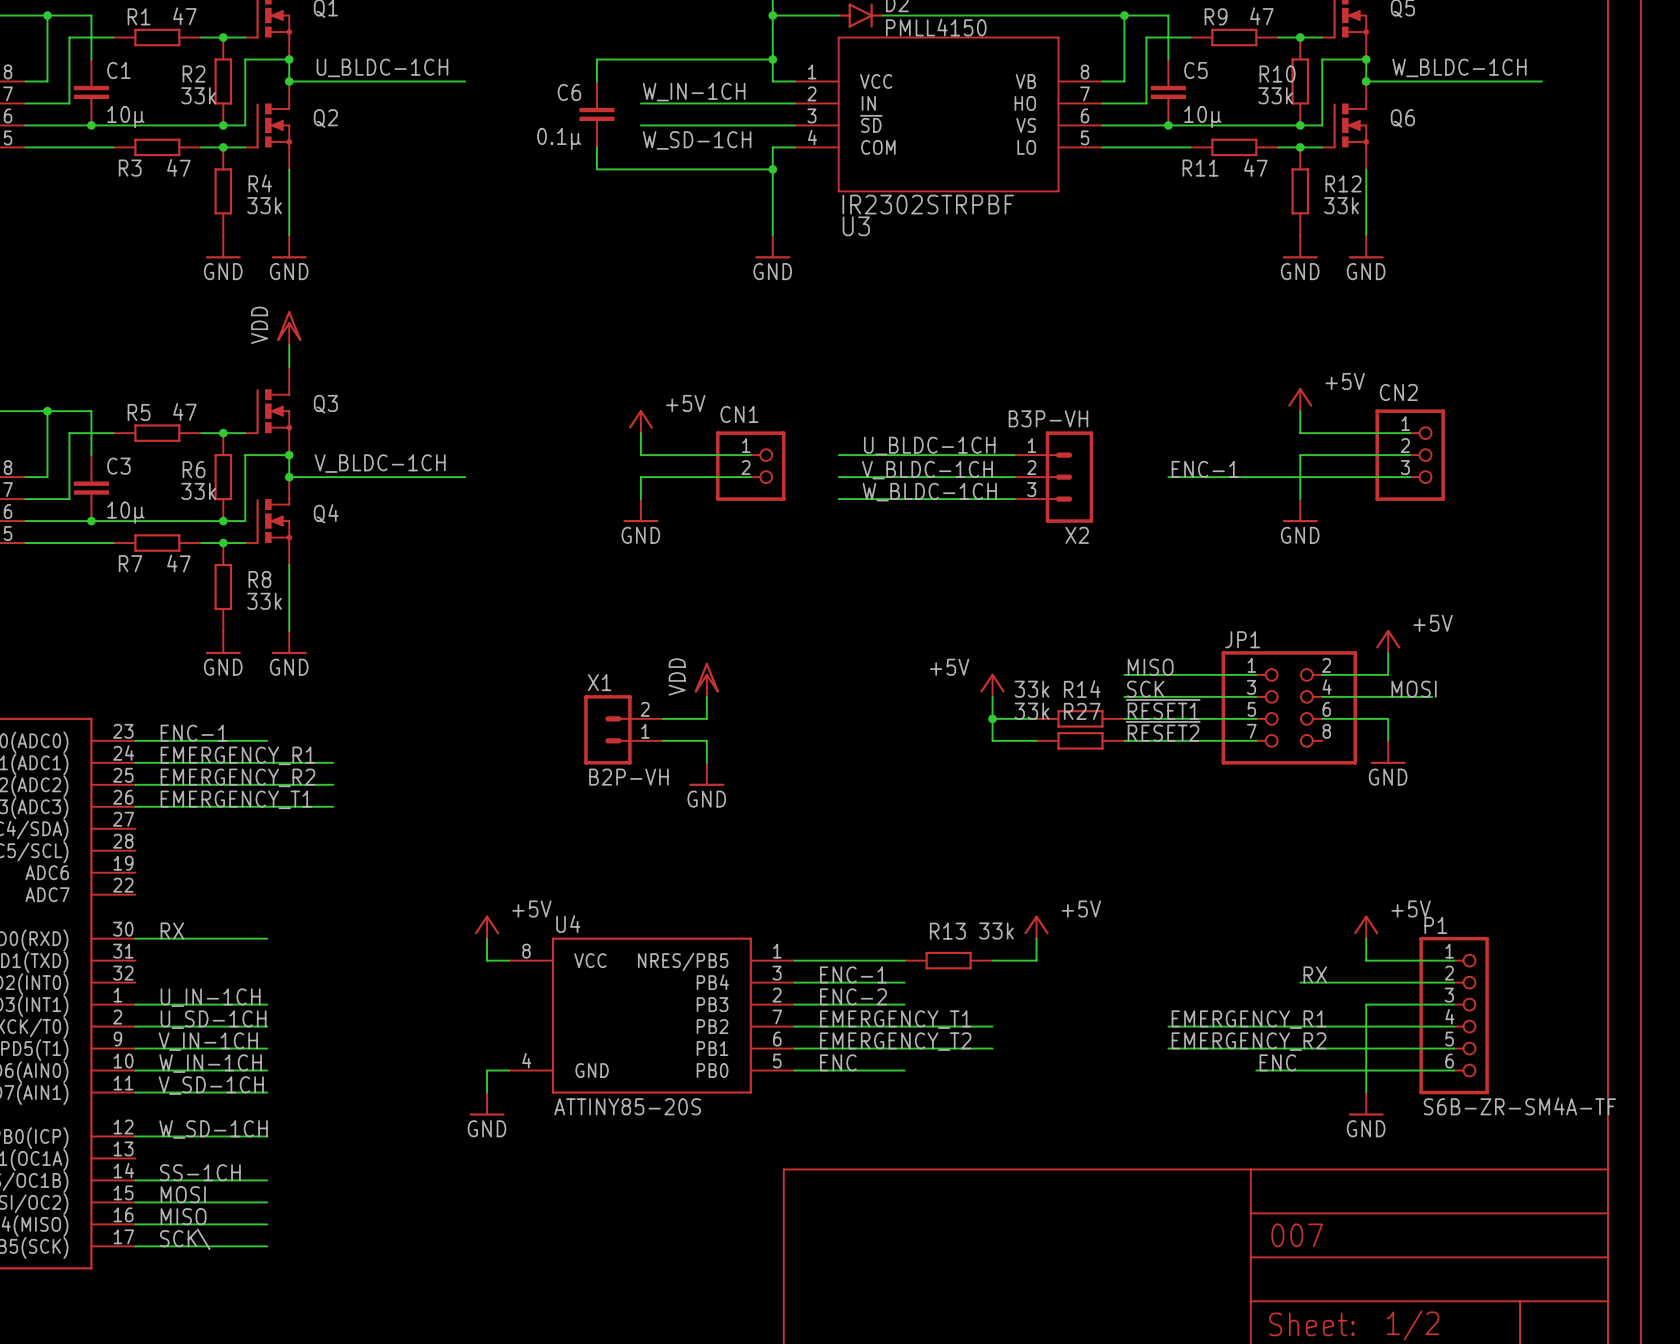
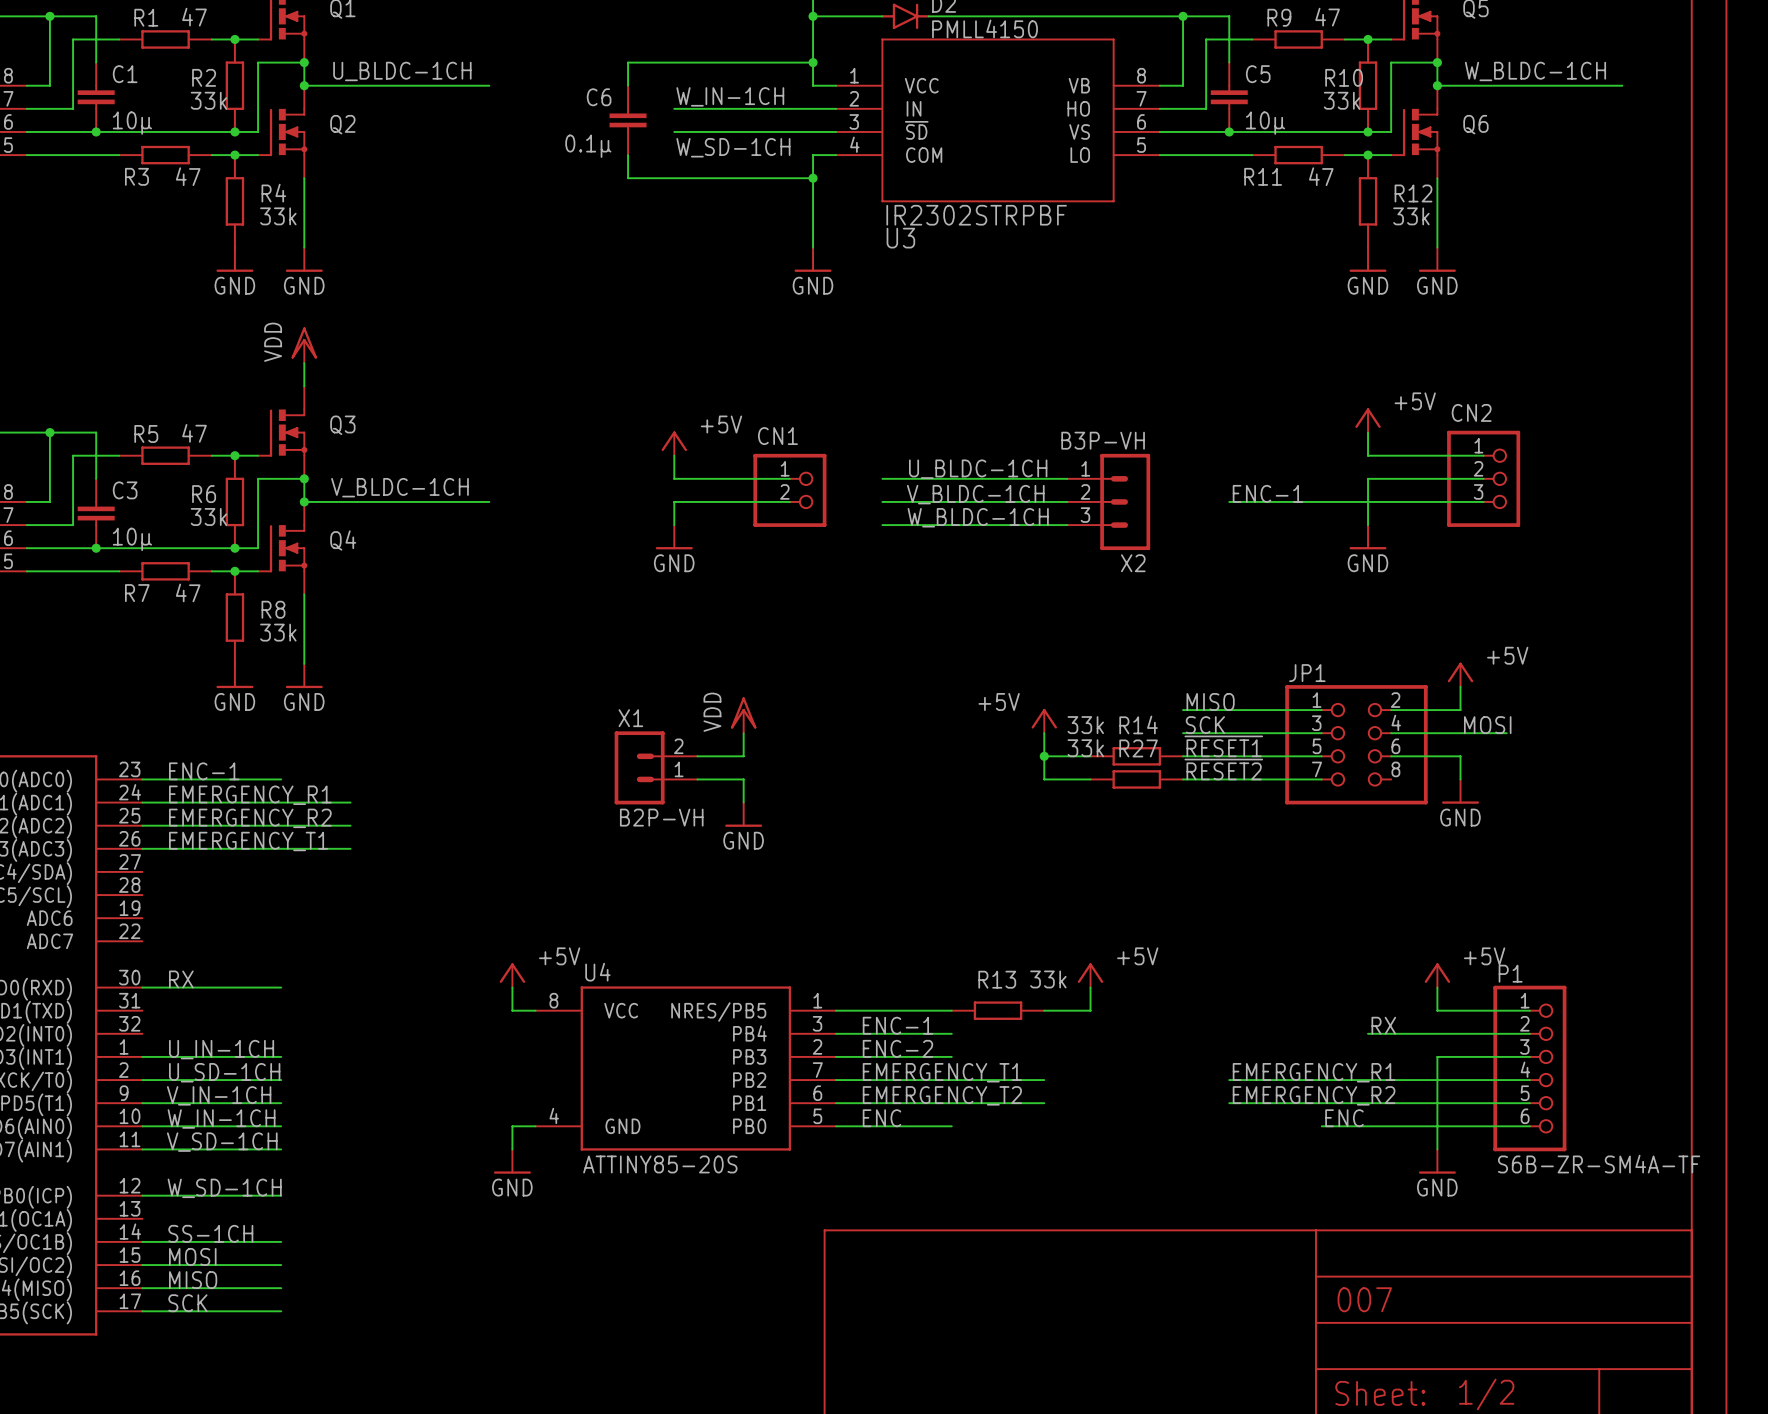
label: SCK\ (185, 1239) -> SCK (187, 1303)

